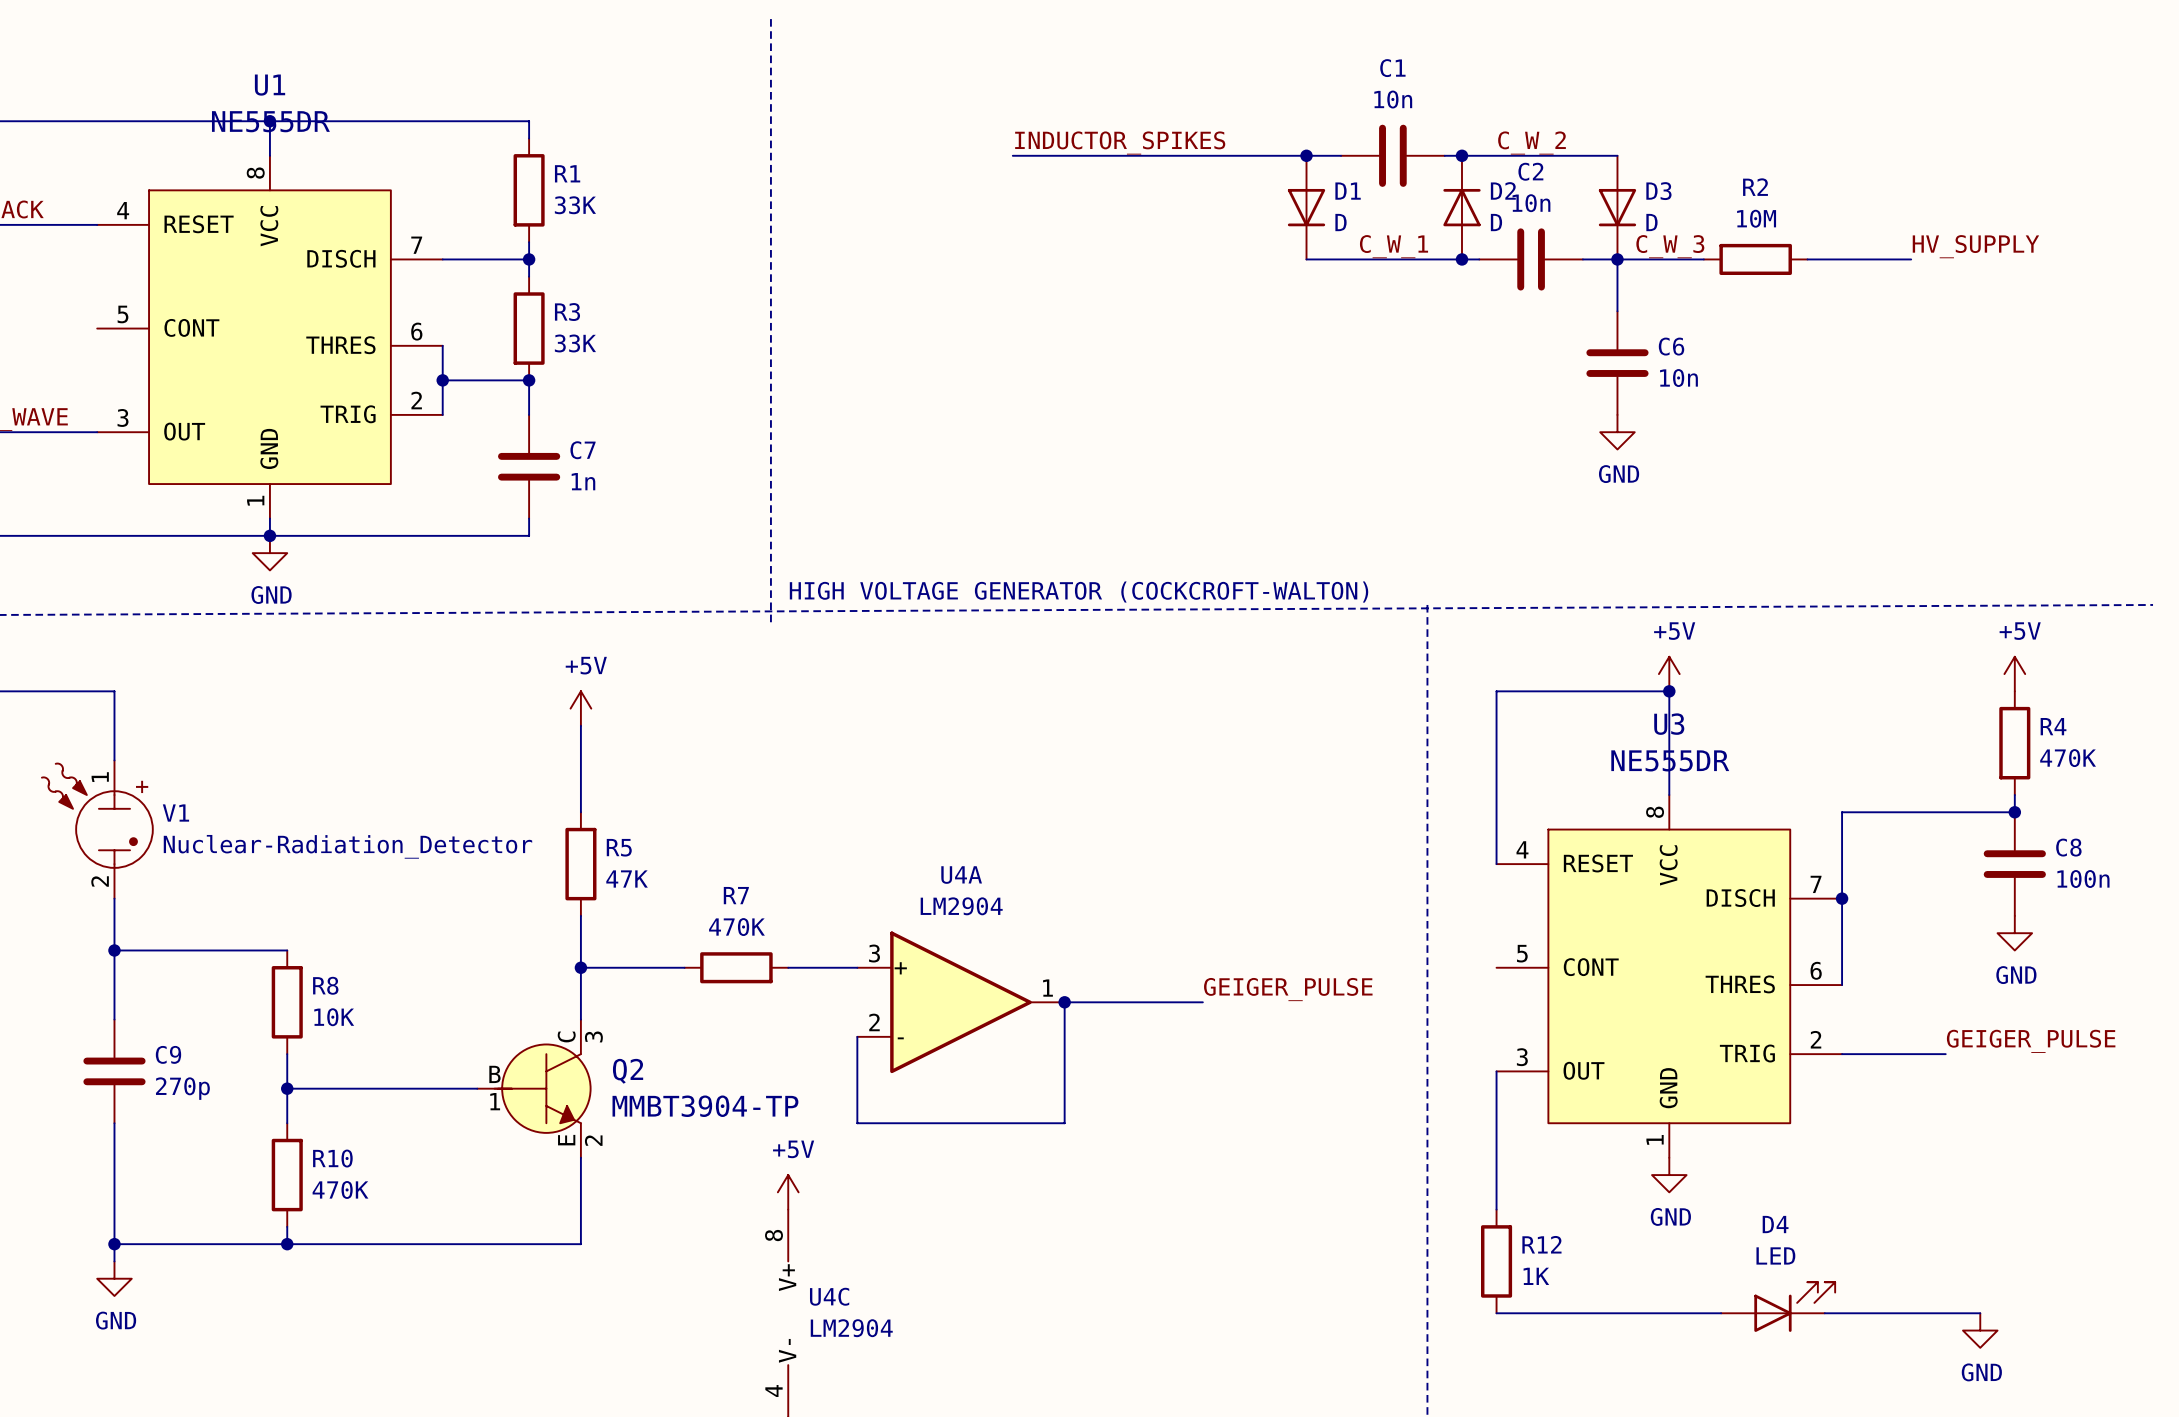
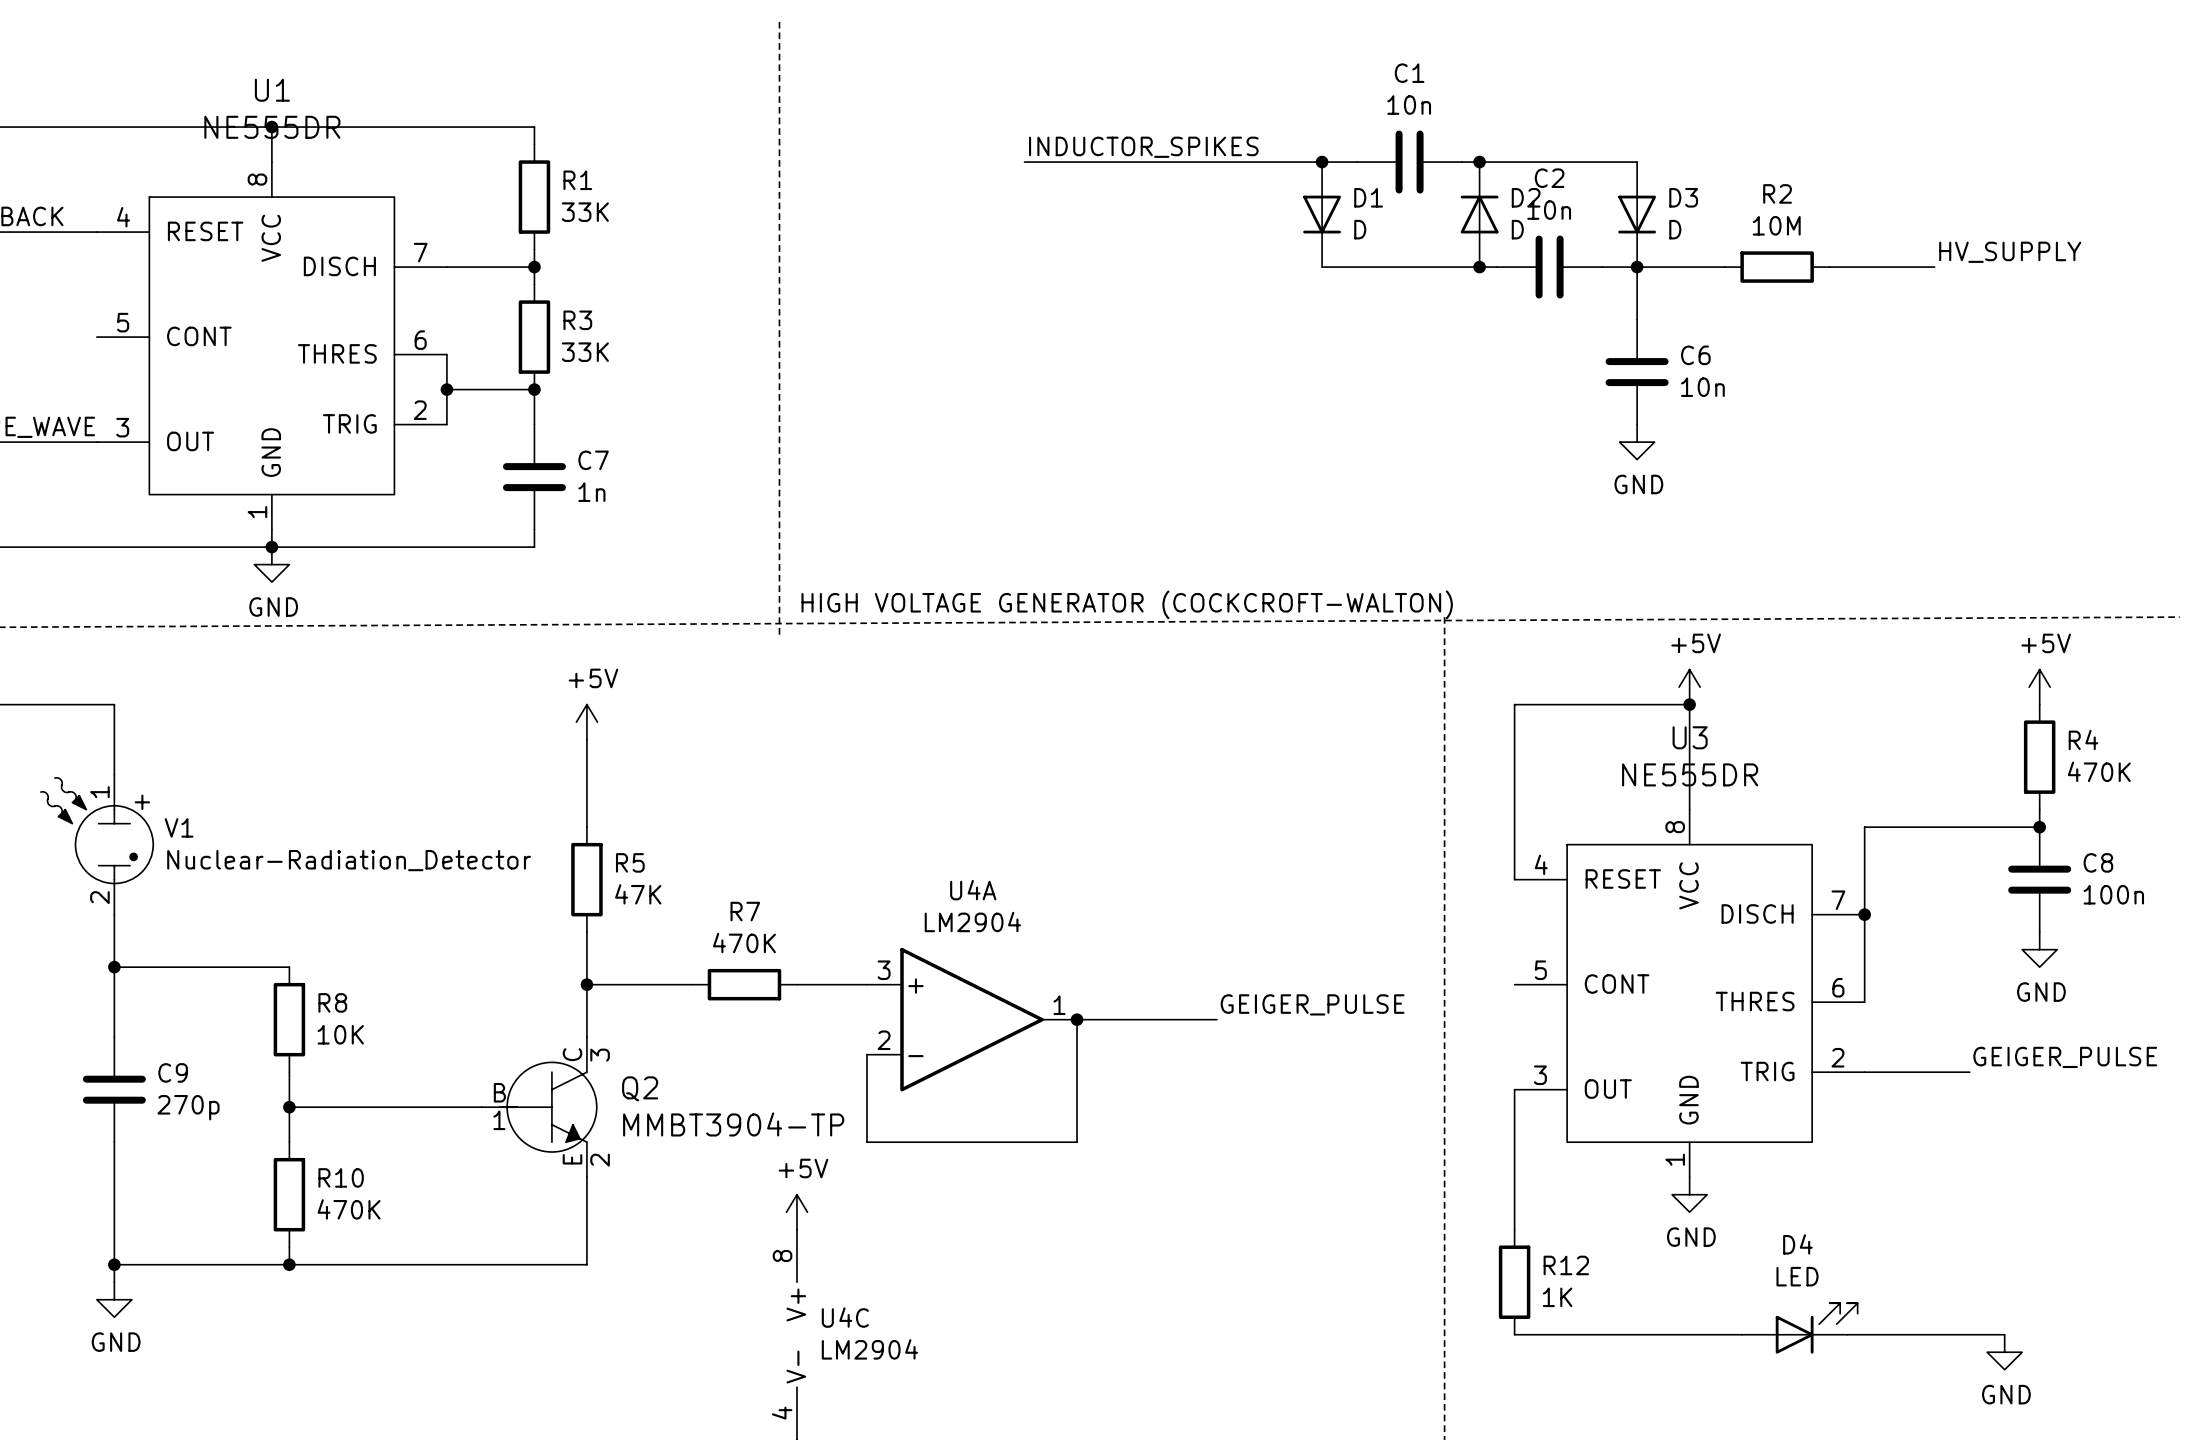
label: C_W_2 (1532, 143) -> none
label: C_W_1 (1394, 246) -> none
label: C_W_3 (1670, 246) -> none

